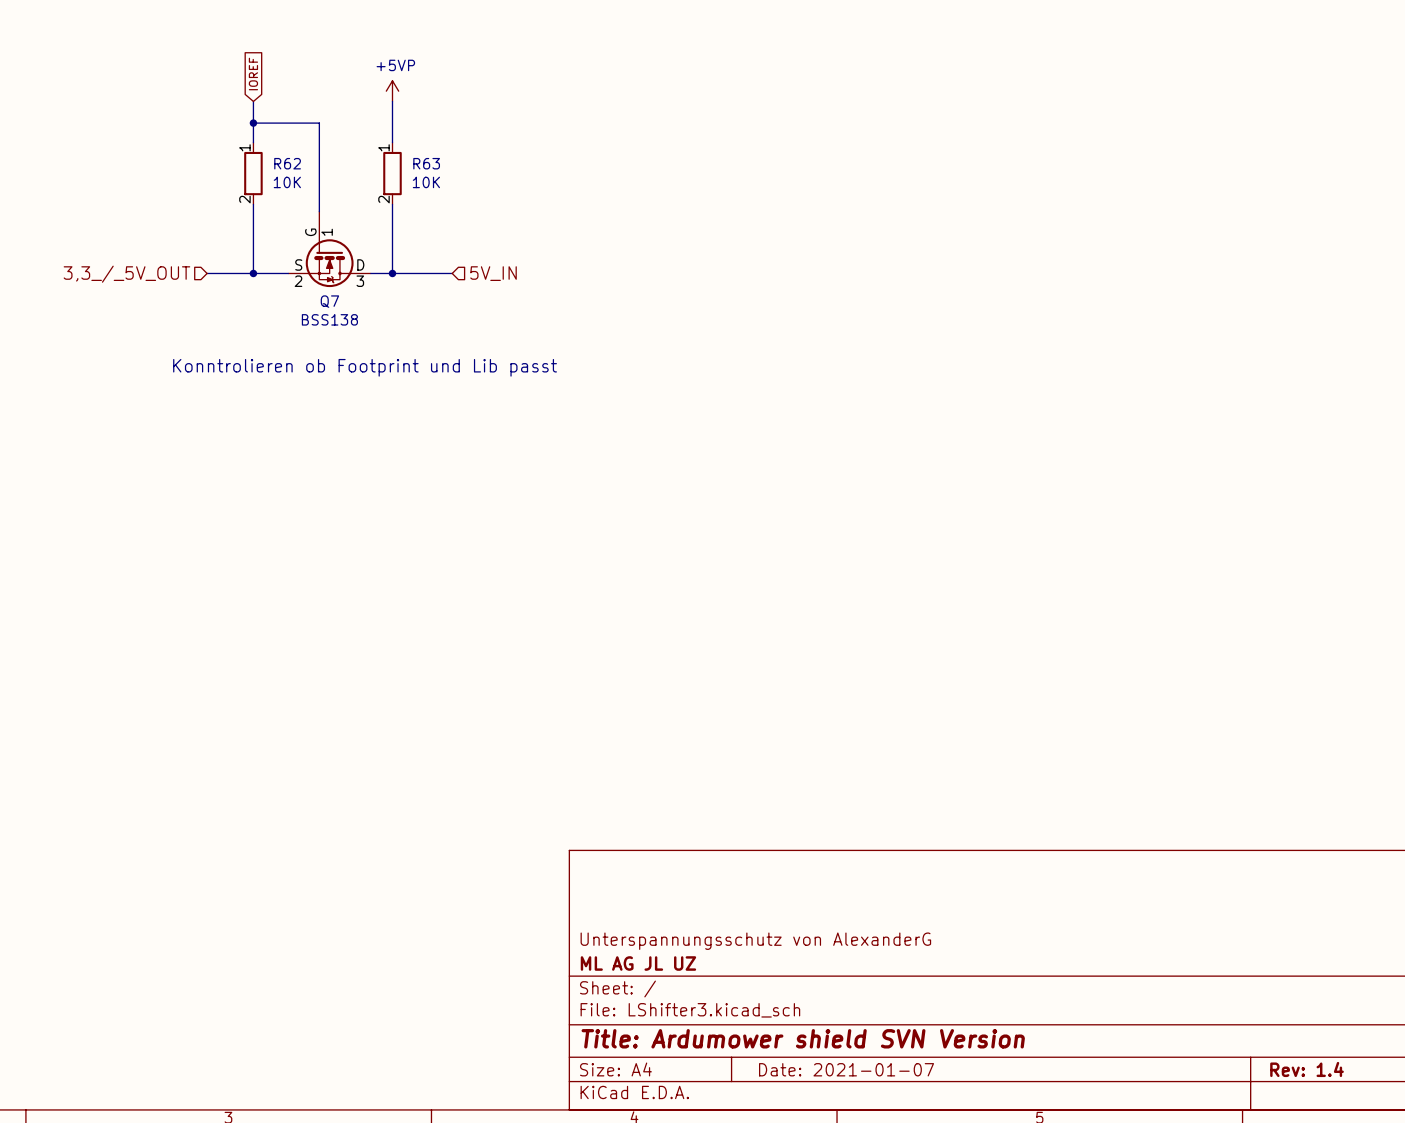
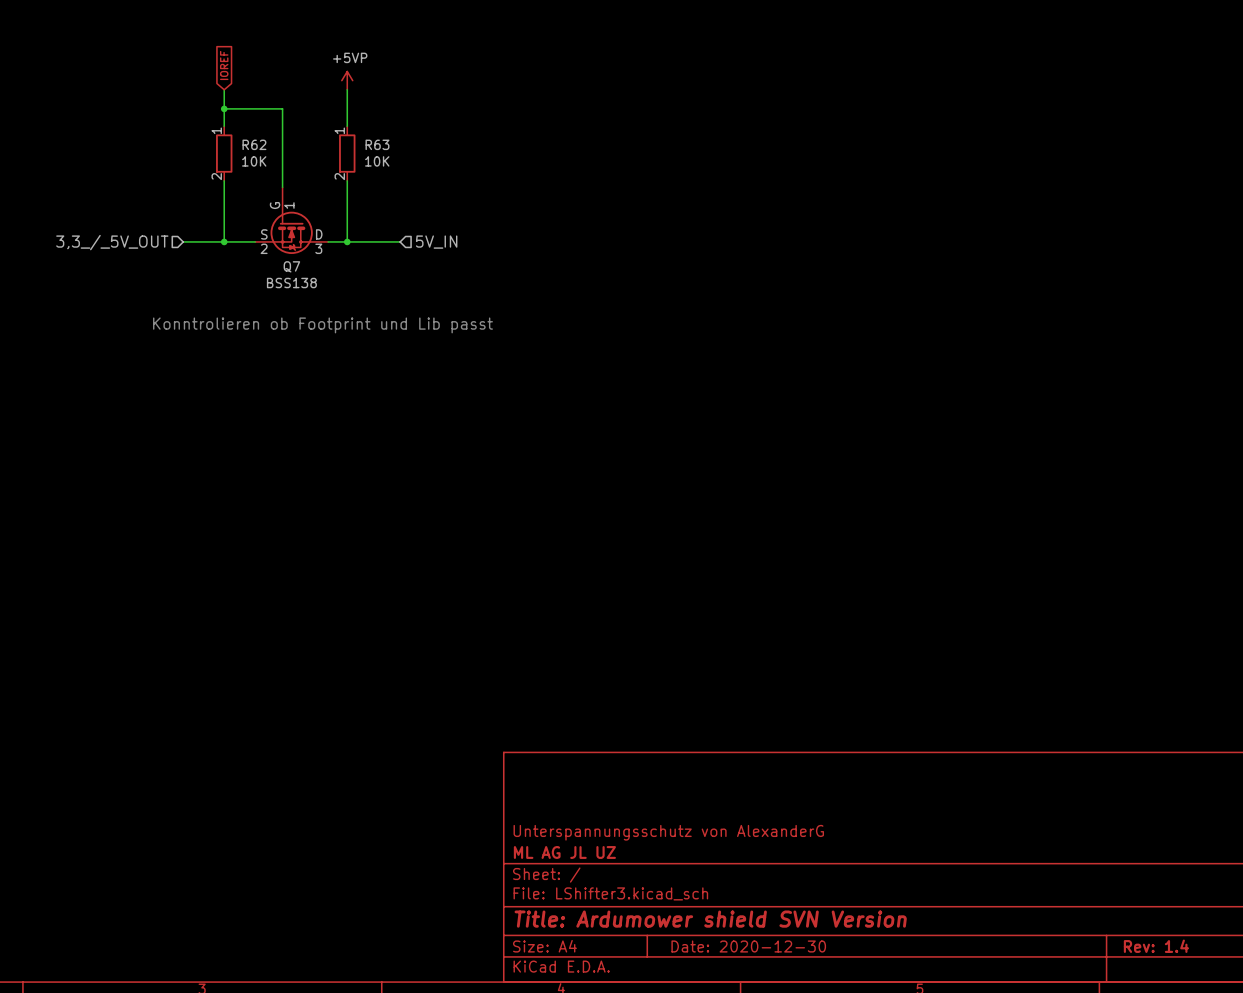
title block: Date: 2021-01-07 (846, 1069) -> Date: 2020-12-30 (748, 946)

